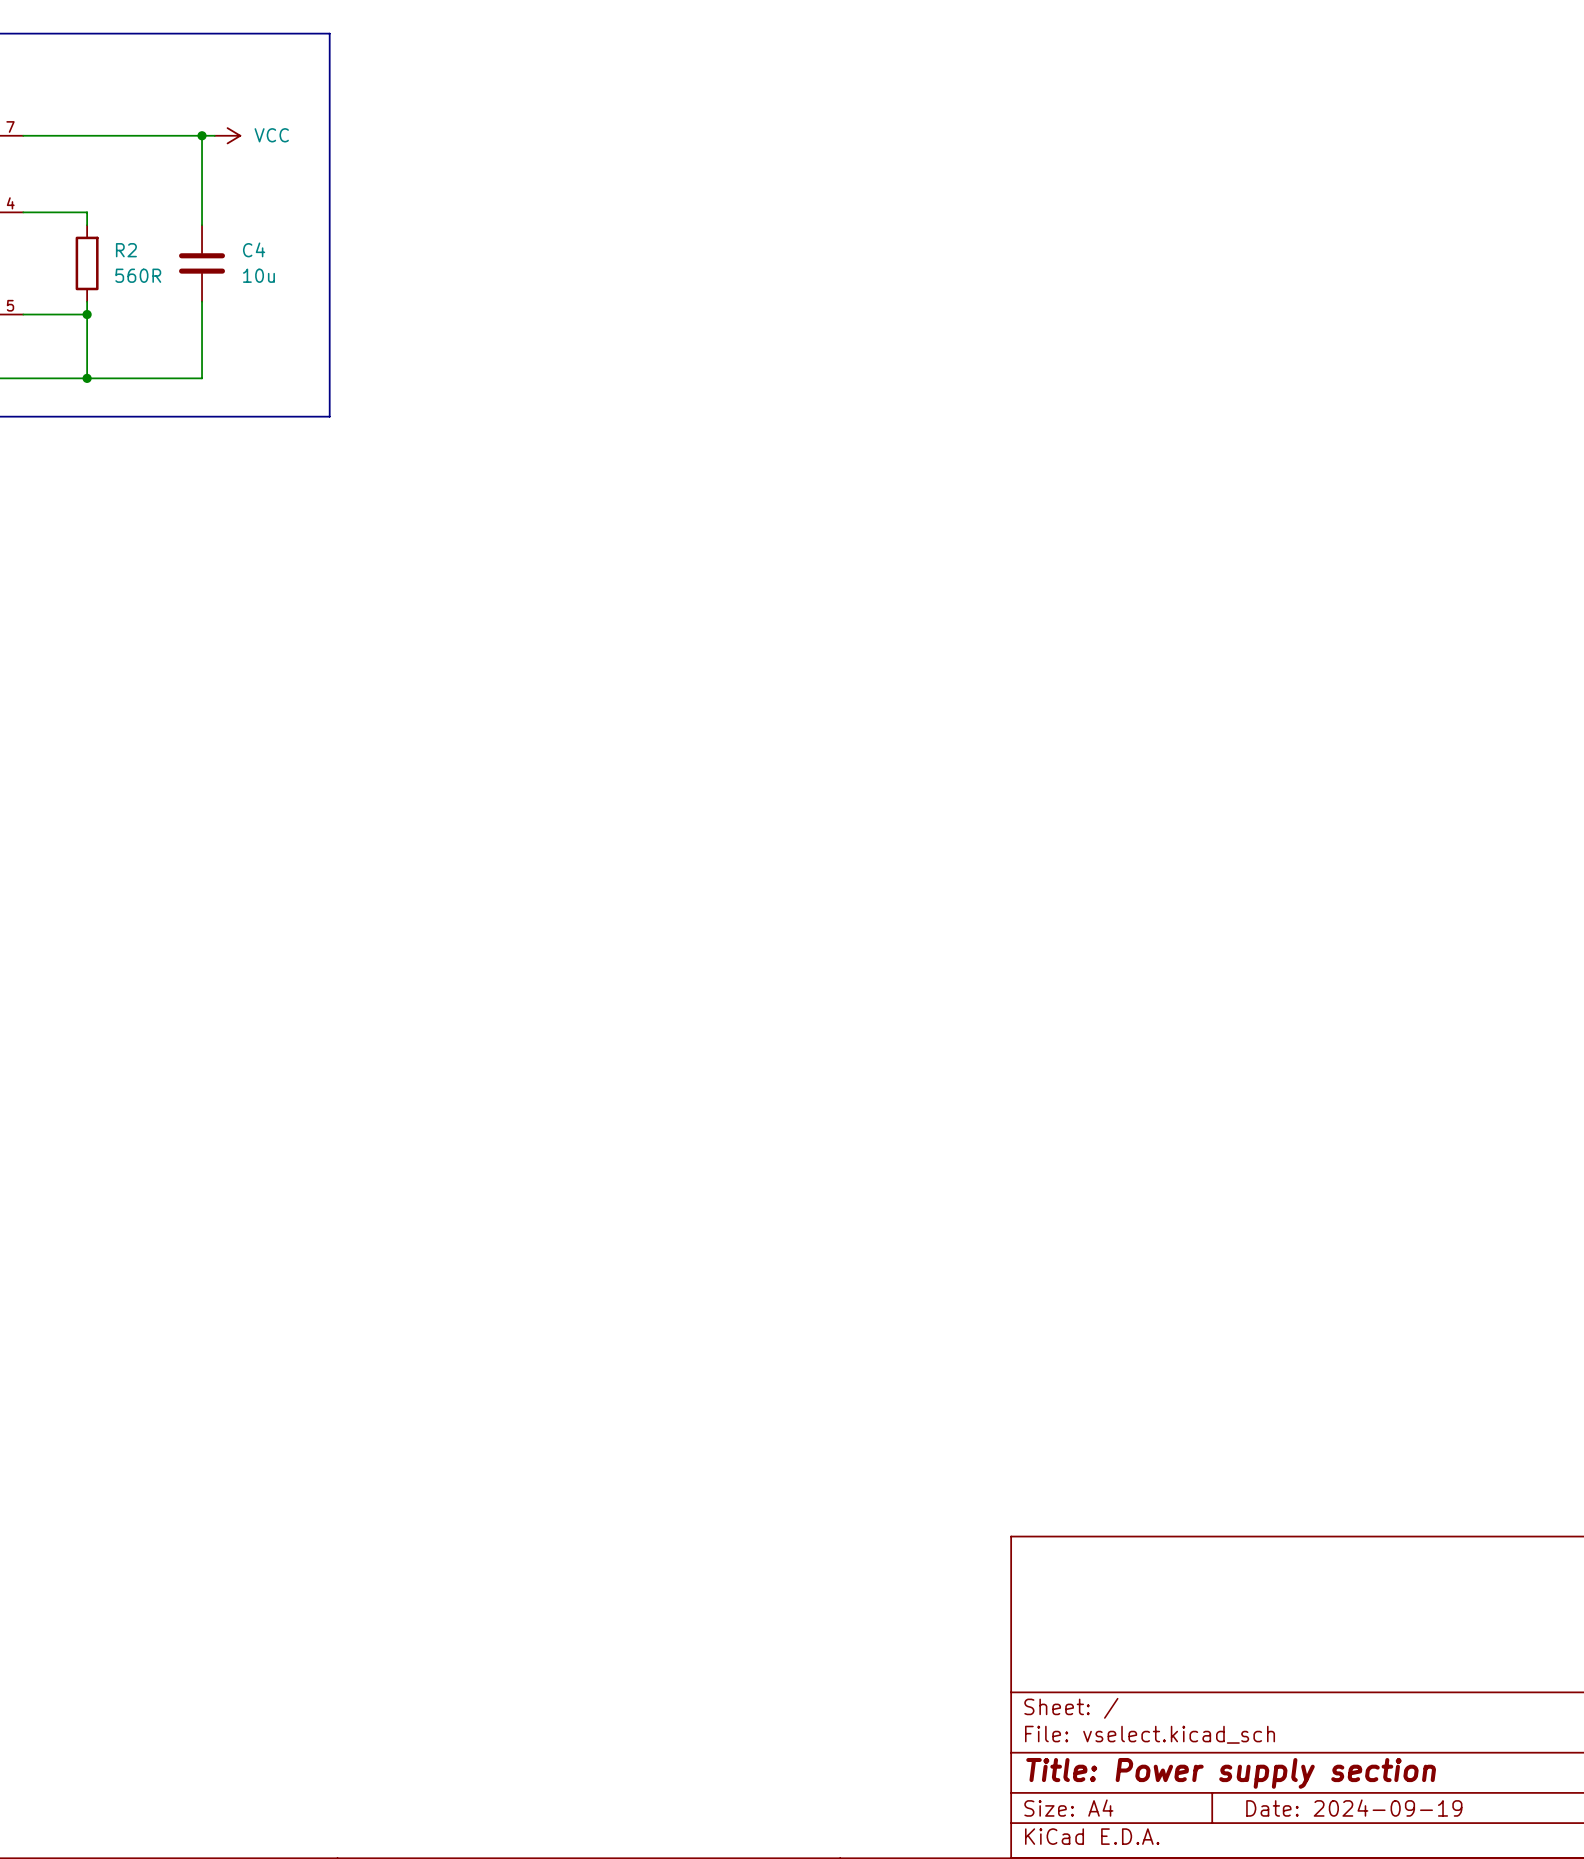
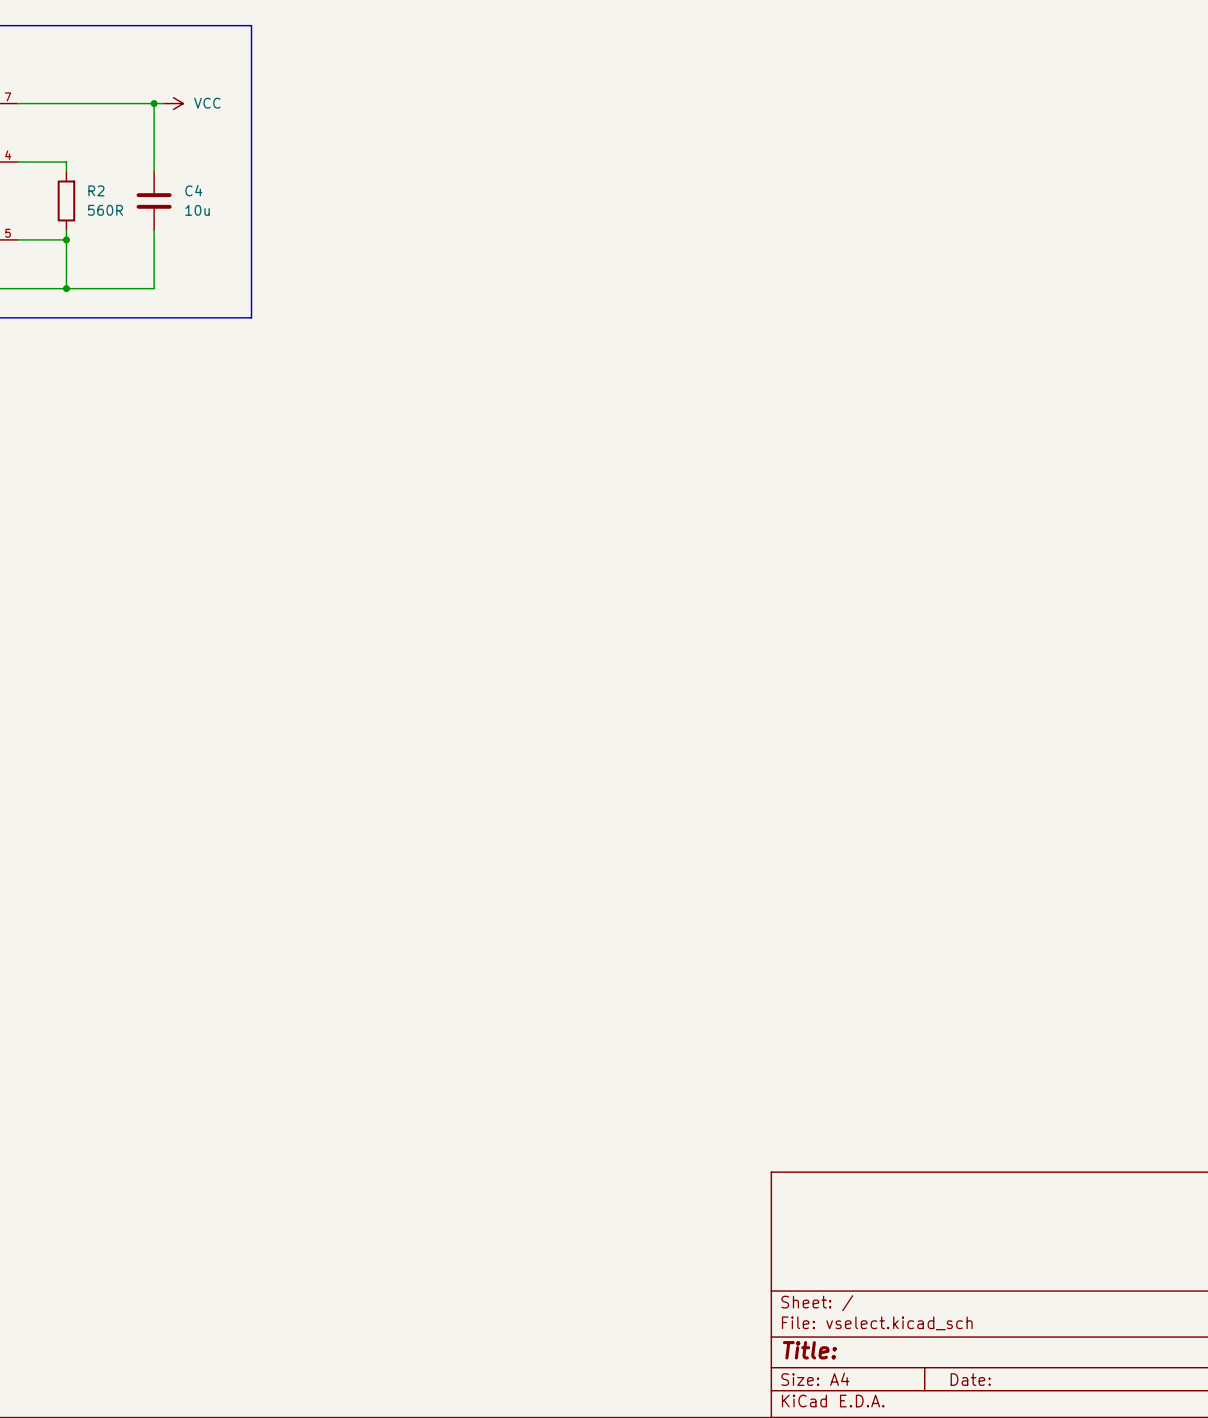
title block: Title: Power supply section (1231, 1773) -> Title: (809, 1350)
title block: Date: 2024-09-19 (1354, 1808) -> Date: (970, 1379)

